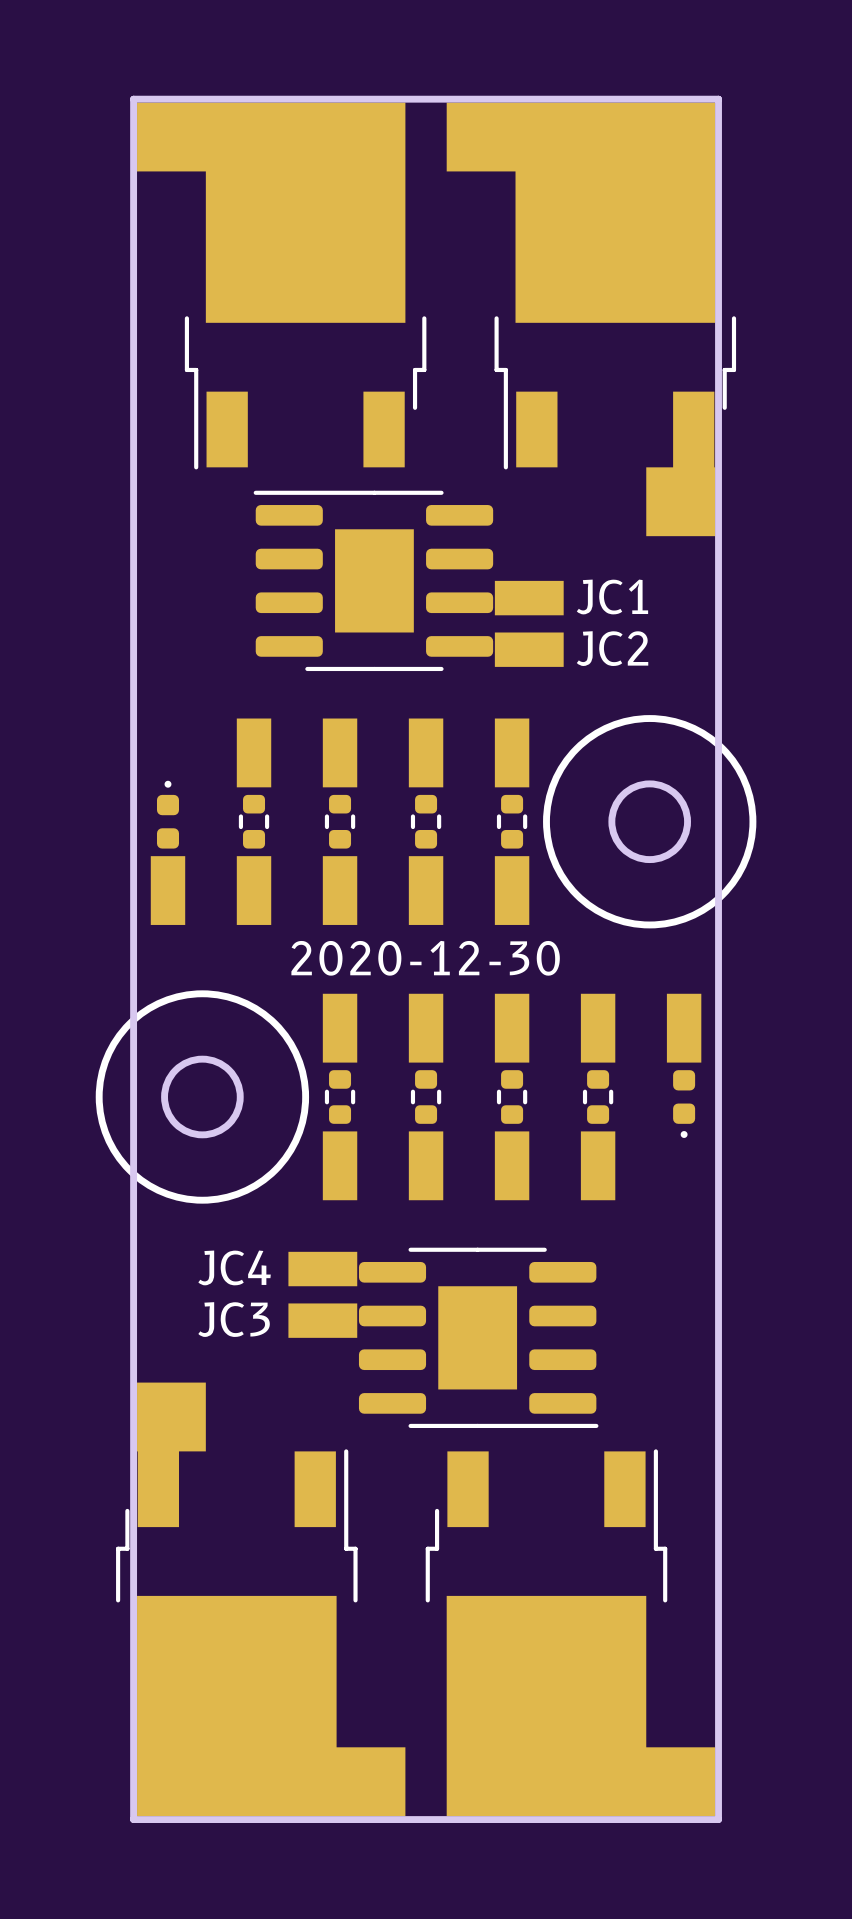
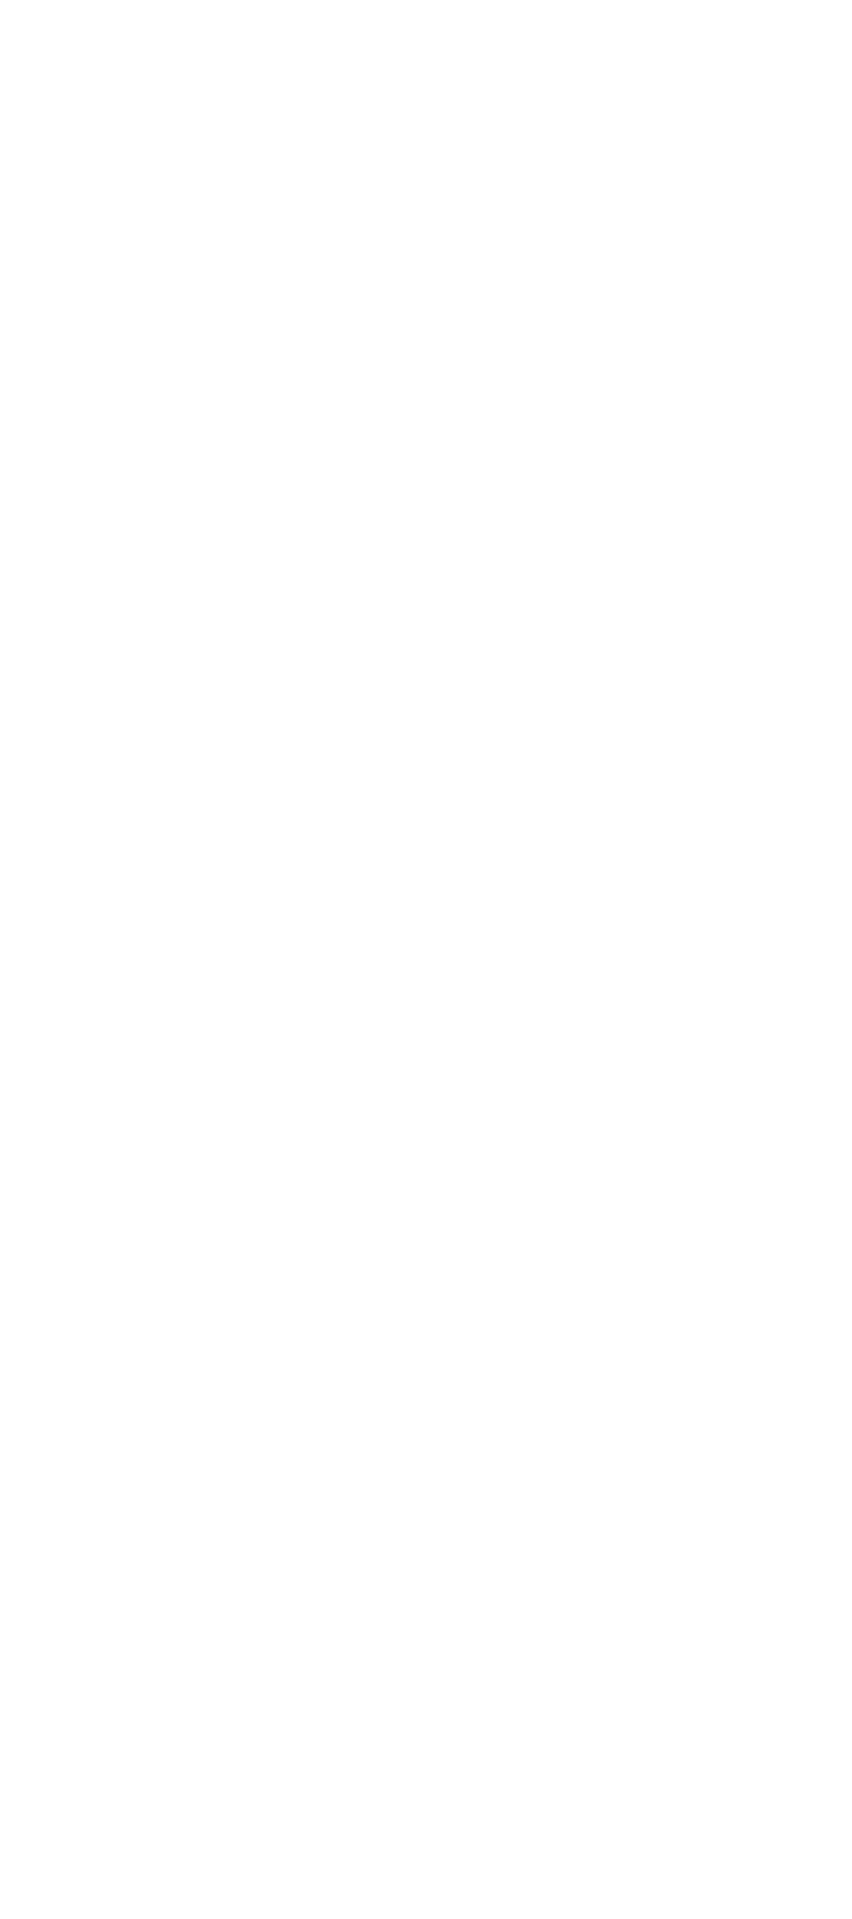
board edge: (133, 99) (133, 1819) (718, 1819) (718, 99) (133, 99) -> none
part: (171, 137) -> none
part: (481, 137) -> none
part: (305, 286) -> none
part: (615, 286) -> none
part: (680, 501) -> none
part: (373, 580) -> none
JC1: (529, 598) -> none
JC2: (529, 649) -> none
drawing: [543, 715, 757, 929] -> none
part: (254, 752) -> none
part: (340, 752) -> none
part: (426, 752) -> none
part: (512, 752) -> none
round board edge: [608, 780, 691, 864] -> none
part: (167, 814) -> none
part: (254, 821) -> none
part: (340, 821) -> none
part: (426, 821) -> none
part: (512, 821) -> none
part: (167, 890) -> none
part: (254, 890) -> none
part: (340, 890) -> none
part: (426, 890) -> none
part: (512, 890) -> none
text: 2020-12-30 (425, 958) -> none
drawing: [95, 990, 310, 1204] -> none
part: (340, 1028) -> none
part: (426, 1028) -> none
part: (512, 1028) -> none
part: (598, 1028) -> none
part: (684, 1028) -> none
round board edge: [161, 1055, 244, 1139] -> none
part: (340, 1097) -> none
part: (426, 1097) -> none
part: (512, 1097) -> none
part: (598, 1097) -> none
part: (684, 1104) -> none
part: (340, 1165) -> none
part: (426, 1165) -> none
part: (512, 1165) -> none
part: (598, 1165) -> none
JC4: (322, 1269) -> none
JC3: (322, 1320) -> none
part: (478, 1337) -> none
part: (171, 1416) -> none
part: (236, 1632) -> none
part: (546, 1632) -> none
part: (371, 1781) -> none
part: (680, 1781) -> none

